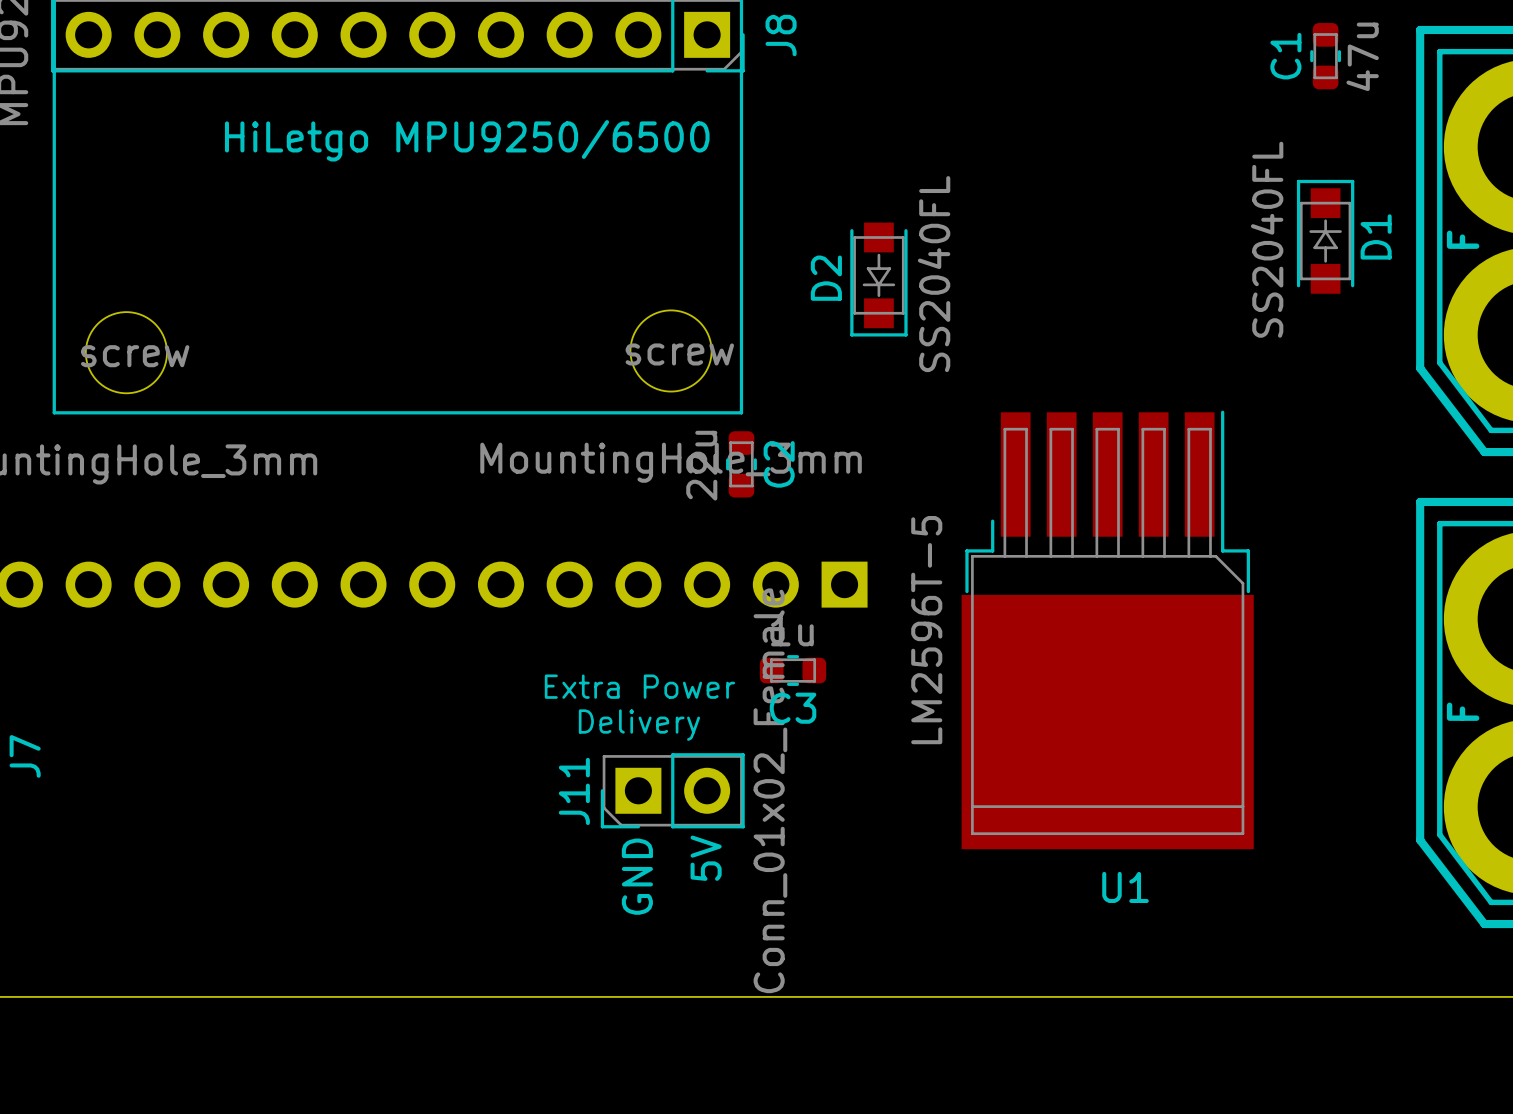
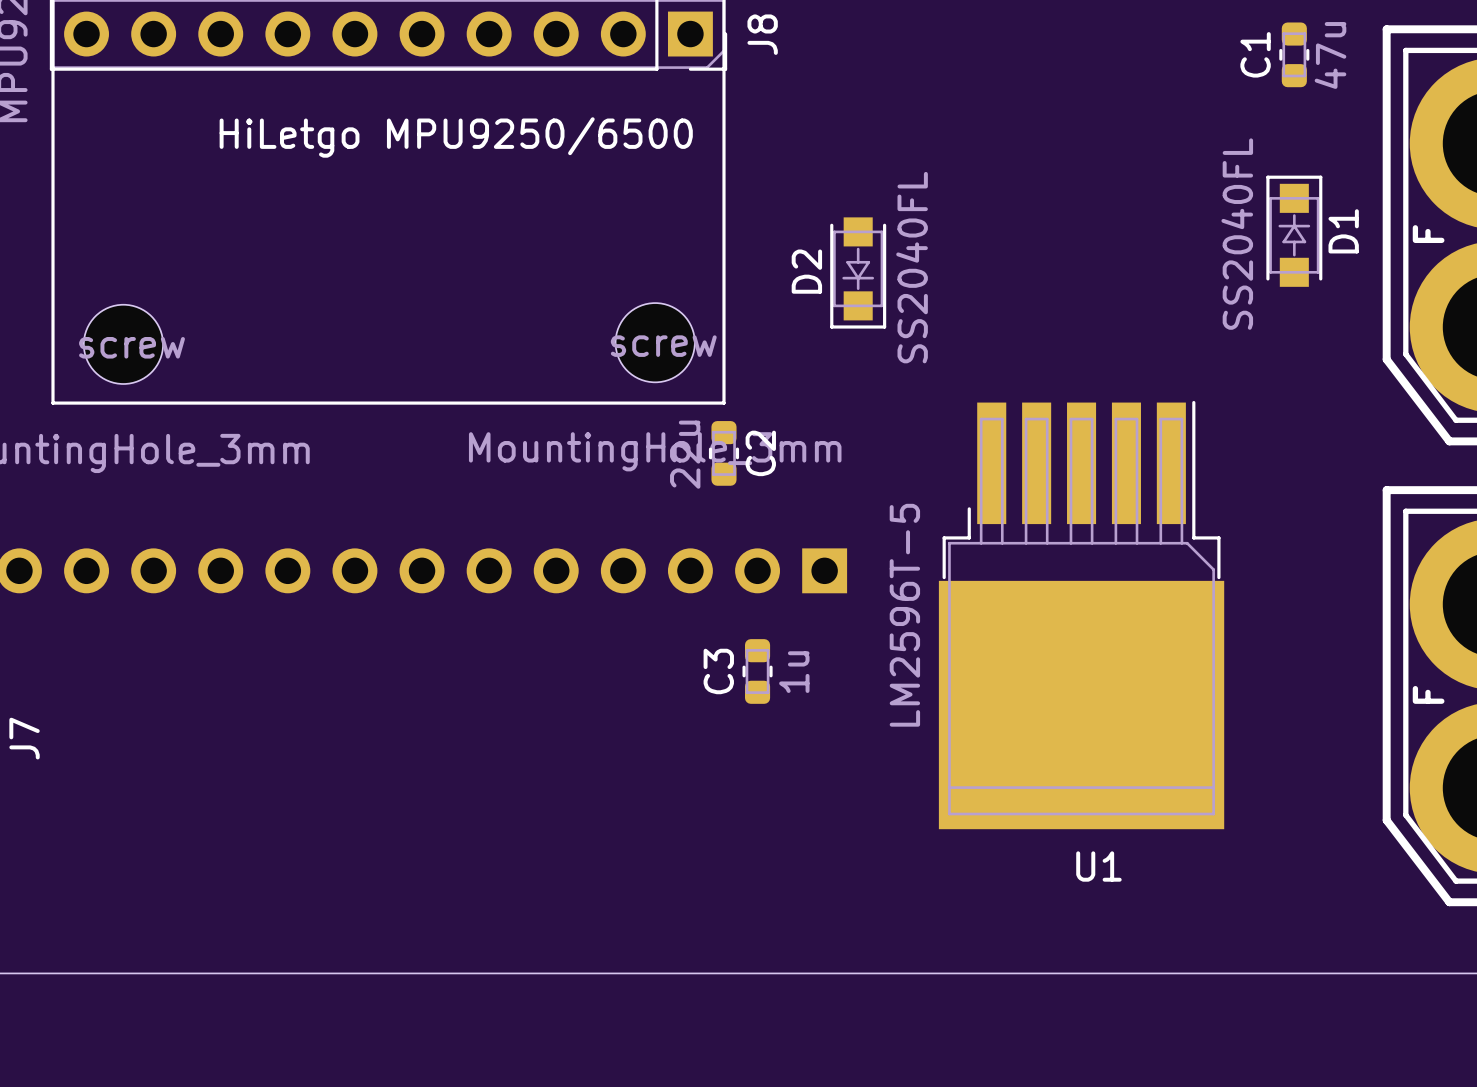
C3 rotation: 0° (793, 670) -> 90° clockwise (757, 671)
text: Extra Power (639, 686) -> none
text: Delivery (639, 725) -> none
J11: Conn_01x02_Female (672, 790) -> none
text: 5V (706, 858) -> none
text: GND (637, 876) -> none

